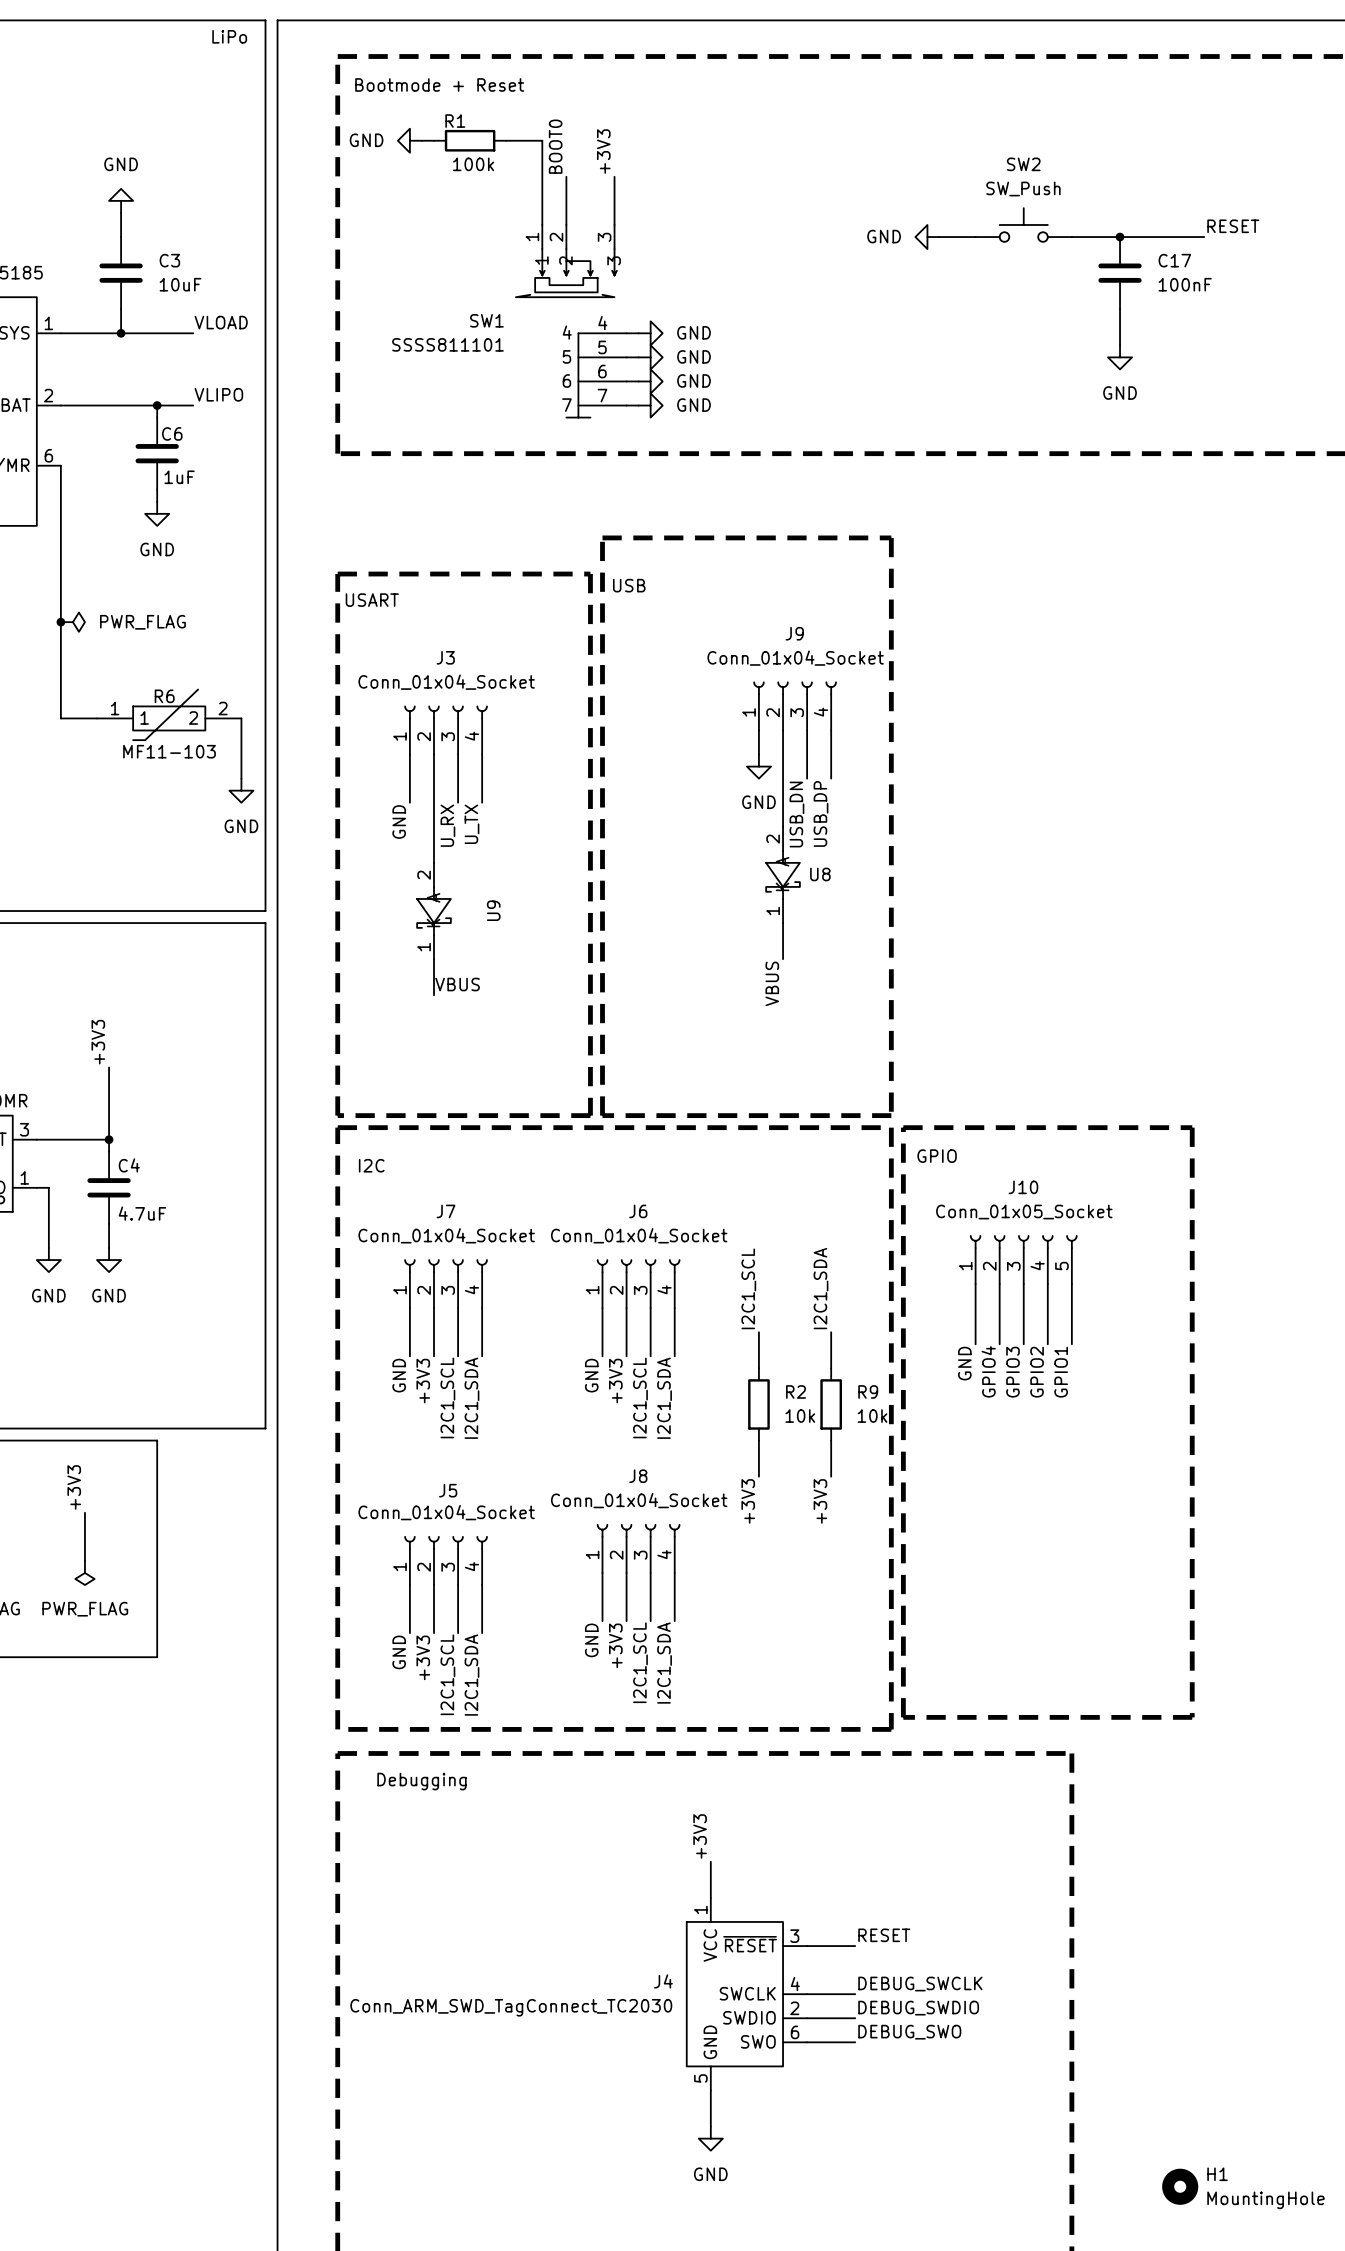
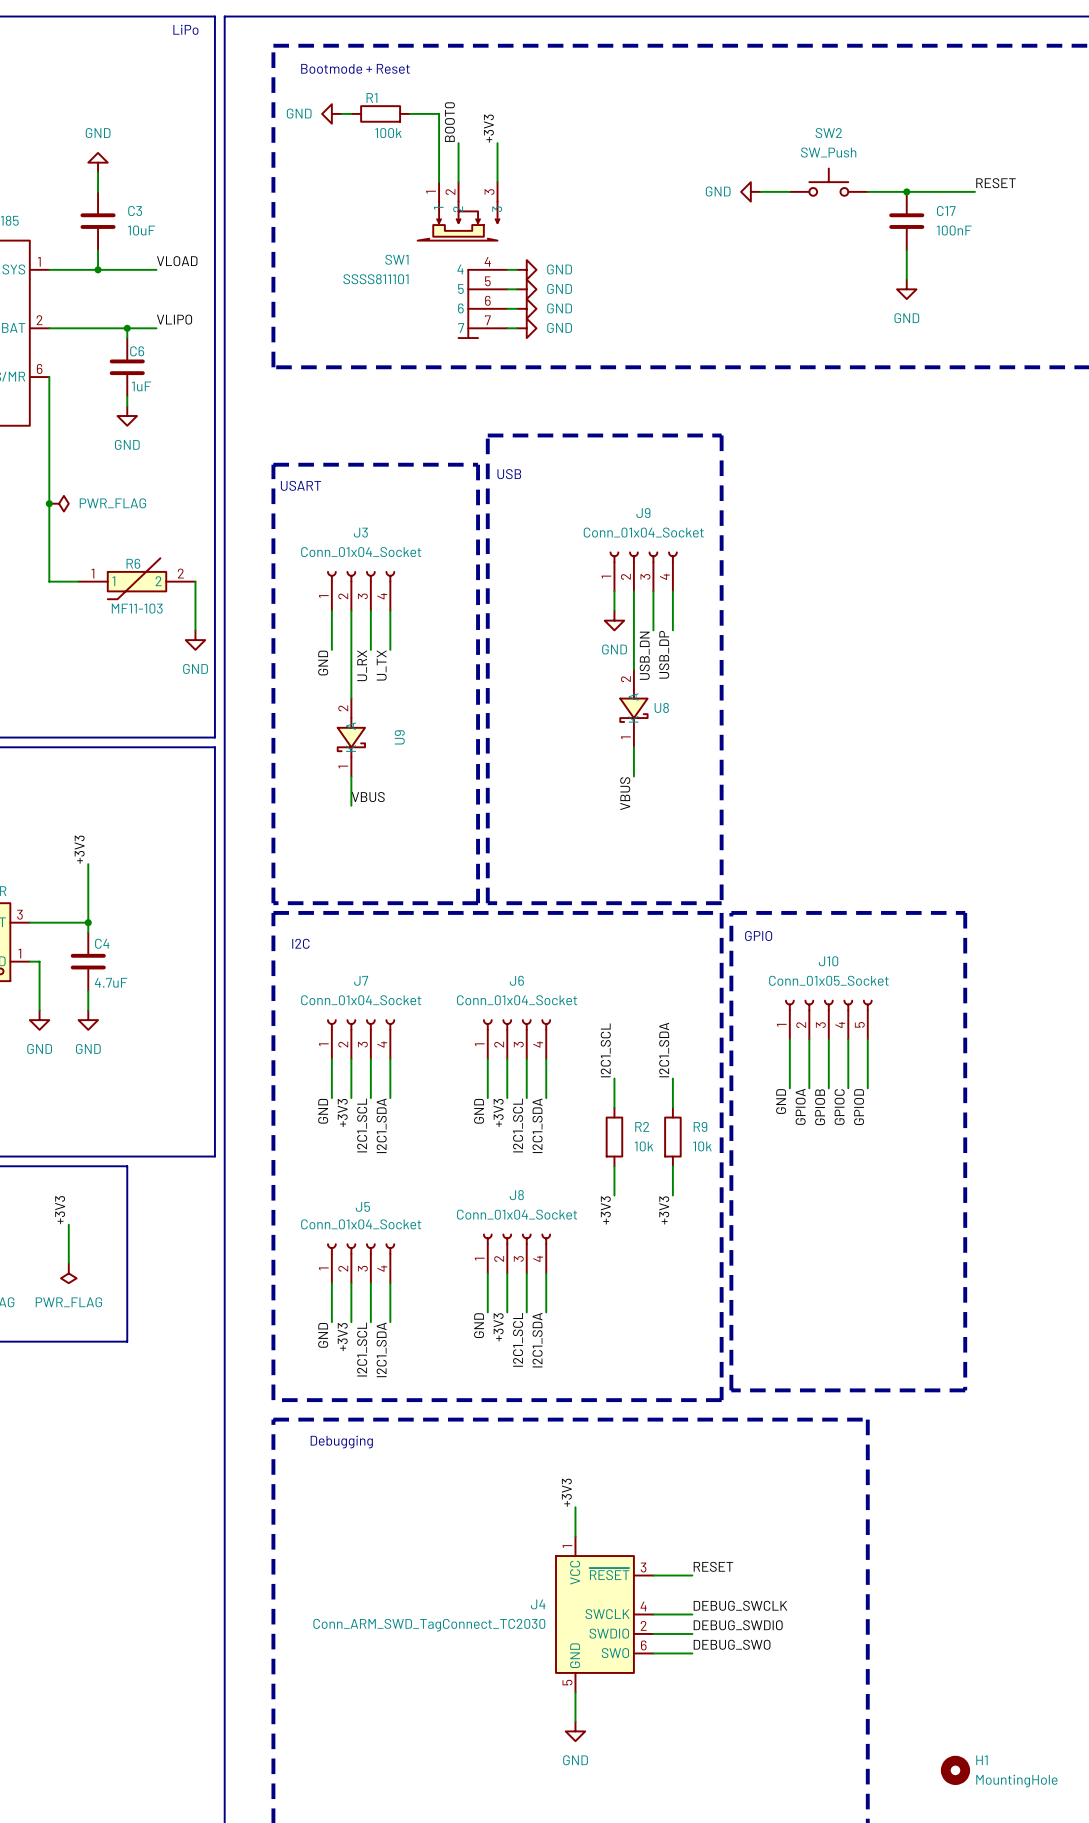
label: GPIO4 (988, 1371) -> GPIOA (800, 1106)
label: GPIO3 (1013, 1372) -> GPIOB (820, 1107)
label: GPIO2 (1037, 1372) -> GPIOC (839, 1107)
label: GPIO1 (1061, 1372) -> GPIOD (859, 1107)

